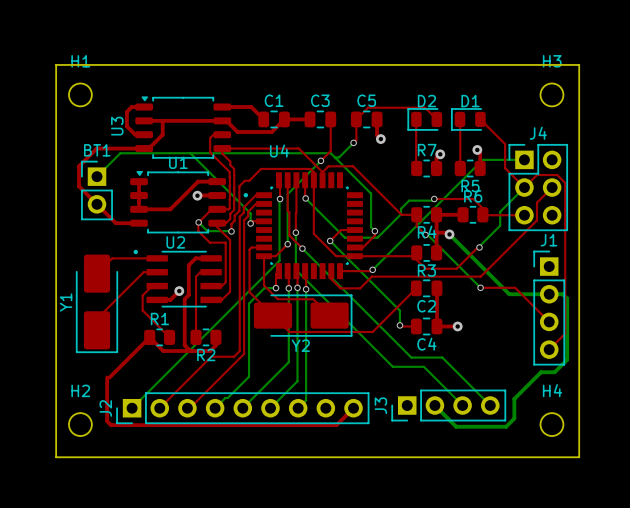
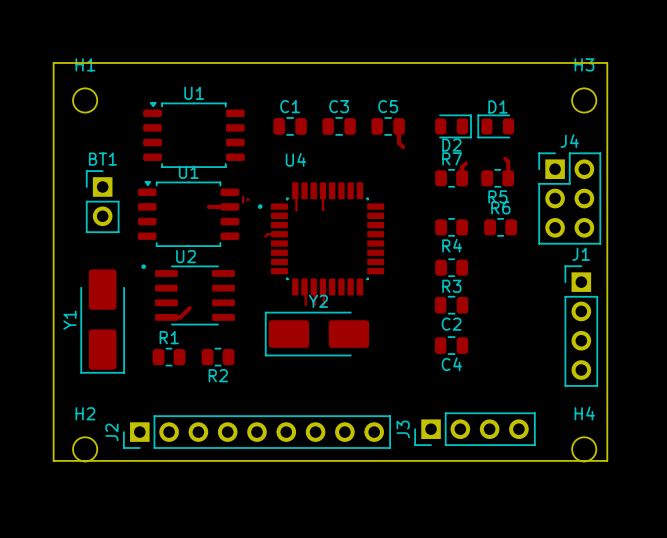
board edge: (56, 64) (579, 64) (579, 457) (56, 457) (56, 64) -> (53, 62) (53, 460) (607, 460) (607, 62) (53, 62)
top track: (144, 107) (131, 107) (126, 111) (126, 126) (135, 134) (144, 134) -> none
top track: (222, 107) (251, 107) (263, 119) (262, 120) -> none
top track: (310, 119) (284, 119) (271, 131) (237, 131) (226, 120) (144, 120) -> none
top track: (330, 119) (330, 151) (320, 160) -> none
top track: (416, 119) (416, 168) -> none
D2 rotation: 0° (424, 119) -> 180° (453, 126)
top track: (436, 119) (425, 107) (368, 107) (356, 119) (356, 140) (353, 142) -> none
top track: (460, 119) (460, 168) -> none
top track: (480, 119) (505, 144) (505, 168) (524, 187) (536, 175) (557, 175) (565, 182) (565, 333) (549, 349) -> none
top track: (162, 120) (162, 134) (148, 148) (96, 148) (79, 166) (79, 186) (115, 223) (144, 223) -> none
U3 name: U3 (117, 126) -> U1 (194, 93)
top track: (222, 134) (213, 134) (210, 137) (210, 152) (229, 172) (229, 177) -> none
via: (380, 139) -> none
bottom track: (353, 142) (339, 157) (334, 157) -> none
via: (353, 142) -> none
via: (477, 149) -> none
bottom track: (190, 153) (250, 213) (250, 223) -> none
via: (440, 154) -> none
bottom track: (524, 159) (482, 159) (372, 269) -> none
bottom track: (320, 160) (287, 194) (287, 244) -> none
via: (320, 160) -> none
top track: (322, 172) (328, 166) (353, 166) (401, 214) (416, 214) (416, 226) (425, 234) -> none
top track: (322, 172) (298, 148) (222, 148) (222, 153) (234, 168) (234, 175) -> none
top track: (234, 175) (234, 187) -> none
bottom track: (97, 176) (120, 153) (330, 153) (371, 193) (371, 227) (374, 231) -> none
top track: (229, 177) (229, 185) -> none
top track: (287, 180) (289, 235) (302, 248) -> none
top track: (296, 180) (295, 232) -> none
top track: (139, 181) (139, 209) (170, 209) (198, 181) (217, 181) -> none
bottom track: (524, 187) (500, 211) (500, 225) (479, 247) -> none
top track: (552, 187) (536, 202) (536, 220) (480, 276) (371, 276) (360, 288) (340, 288) (331, 279) (331, 271) -> none
top track: (234, 189) (234, 201) -> none
top track: (229, 191) (229, 199) -> none
via: (197, 195) -> none
top track: (264, 195) (256, 195) (243, 207) (243, 212) (239, 216) (239, 351) (234, 356) (211, 356) (159, 408) -> none
bottom track: (305, 198) (344, 237) (377, 237) (401, 214) (401, 208) (409, 200) (432, 200) (434, 199) -> none
via: (305, 198) -> none
top track: (229, 199) (228, 209) (211, 209) (198, 222) (198, 231) (209, 242) (225, 242) (225, 282) (221, 286) (211, 286) -> none
bottom track: (280, 199) (279, 260) (132, 408) -> none
via: (280, 199) -> none
top track: (434, 199) (473, 199) (482, 208) (483, 215) (524, 215) -> none
via: (434, 199) -> none
top track: (234, 201) (234, 210) (230, 213) -> none
top track: (264, 203) (256, 203) (248, 211) (248, 216) (244, 220) (244, 353) (189, 408) (187, 408) -> none
top track: (230, 213) (230, 218) (226, 223) (217, 223) (217, 227) (230, 239) (230, 291) (221, 299) (211, 299) -> none
top track: (463, 214) (436, 214) (436, 252) -> none
bottom track: (198, 222) (207, 231) (231, 231) -> none
via: (198, 222) -> none
via: (250, 223) -> none
top track: (354, 230) (341, 230) (330, 240) -> none
top track: (231, 231) (234, 215) (239, 210) (239, 186) (244, 180) (249, 180) (261, 168) (310, 168) (313, 172) (313, 233) (336, 256) (413, 256) (416, 252) (416, 259) (425, 268) (456, 268) (479, 247) -> none
via: (231, 231) -> none
top track: (374, 231) (374, 235) (362, 247) (354, 247) -> none
via: (374, 231) -> none
bottom track: (295, 232) (295, 269) (392, 366) (423, 366) (462, 405) -> none
via: (295, 232) -> none
top track: (436, 232) (449, 234) -> none
bottom track: (425, 234) (427, 234) (480, 287) -> none
via: (425, 234) -> none
bottom track: (449, 234) (509, 294) (562, 294) (567, 298) (567, 359) (554, 372) (541, 372) (514, 398) (514, 418) (506, 426) (456, 426) (434, 405) (434, 399) -> none
via: (449, 234) -> none
bottom track: (330, 240) (399, 310) (399, 325) -> none
via: (330, 240) -> none
top track: (287, 244) (275, 256) (264, 256) (264, 285) (277, 299) (313, 299) (329, 315) -> none
via: (287, 244) -> none
top track: (264, 247) (251, 247) (249, 249) (249, 292) (289, 331) (372, 331) (416, 288) -> none
via: (479, 247) -> none
bottom track: (302, 248) (411, 357) (442, 357) (490, 405) -> none
via: (302, 248) -> none
top track: (157, 258) (112, 258) (97, 273) -> none
top track: (211, 258) (195, 258) (188, 265) (188, 295) (184, 299) (184, 345) (190, 351) -> none
top track: (372, 269) (340, 271) -> none
via: (372, 269) -> none
top track: (278, 271) (275, 274) (275, 288) -> none
top track: (157, 272) (143, 272) (97, 318) (97, 330) -> none
top track: (211, 272) (200, 272) (196, 276) (196, 337) -> none
top track: (157, 286) (152, 286) (142, 295) (142, 310) (169, 337) -> none
bottom track: (297, 287) (297, 381) (270, 408) -> none
via: (297, 287) -> none
top track: (480, 287) (515, 287) (549, 321) -> none
via: (480, 287) -> none
bottom track: (275, 288) (264, 288) (249, 303) (249, 376) (215, 408) -> none
via: (275, 288) -> none
bottom track: (288, 288) (288, 362) (242, 408) -> none
via: (288, 288) -> none
top track: (436, 288) (436, 326) (457, 326) -> none
bottom track: (306, 289) (306, 400) (298, 408) -> none
via: (306, 289) -> none
via: (179, 291) -> none
Y2 rotation: 0° (303, 315) -> 180° (317, 334)
top track: (399, 325) (416, 326) -> none
via: (399, 325) -> none
via: (457, 326) -> none
top track: (149, 337) (163, 351) (210, 351) (215, 345) (215, 337) -> none
top track: (149, 337) (109, 377) -> none
top track: (107, 377) (107, 421) (110, 425) (336, 425) (353, 408) -> none

